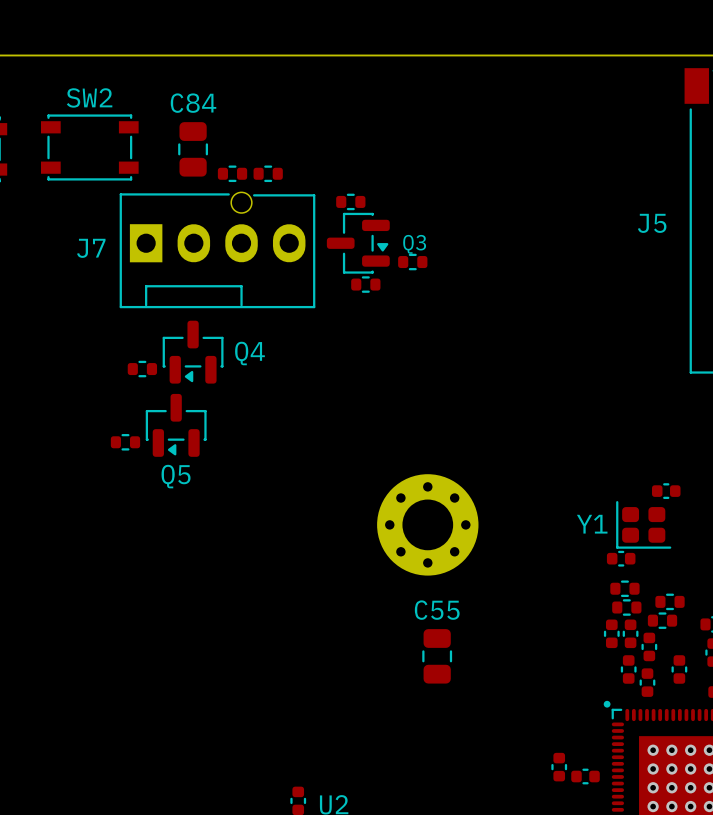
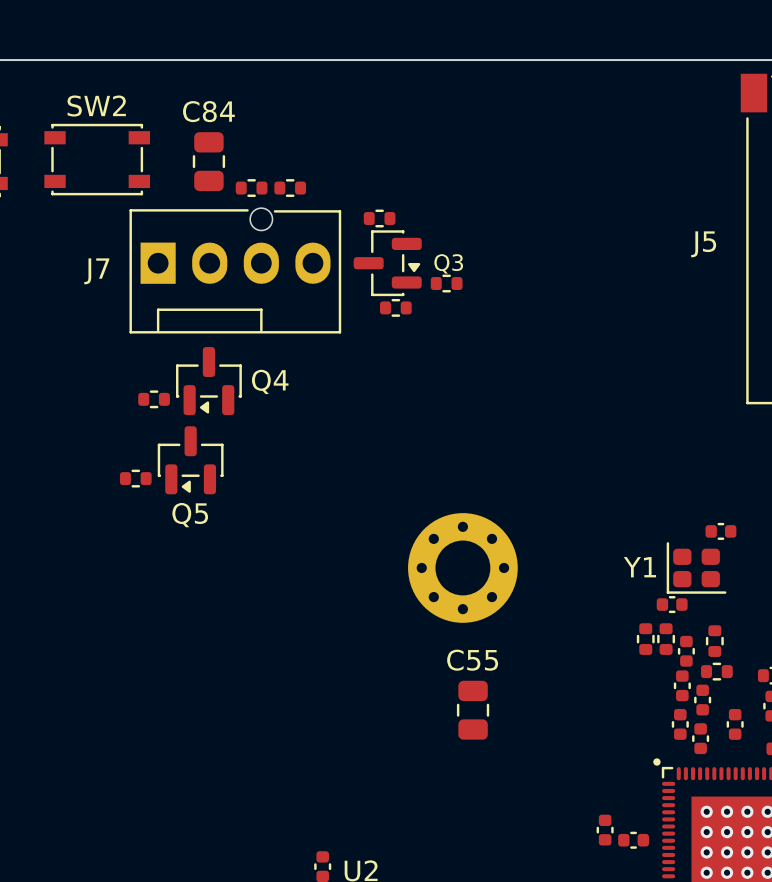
part rotation: 0° (624, 588) -> 90° clockwise (666, 639)
part: none -> (645, 639)
part rotation: 0° (670, 601) -> 90° clockwise (714, 641)
part: (626, 607) -> none
part position: (611, 633) -> (686, 651)

